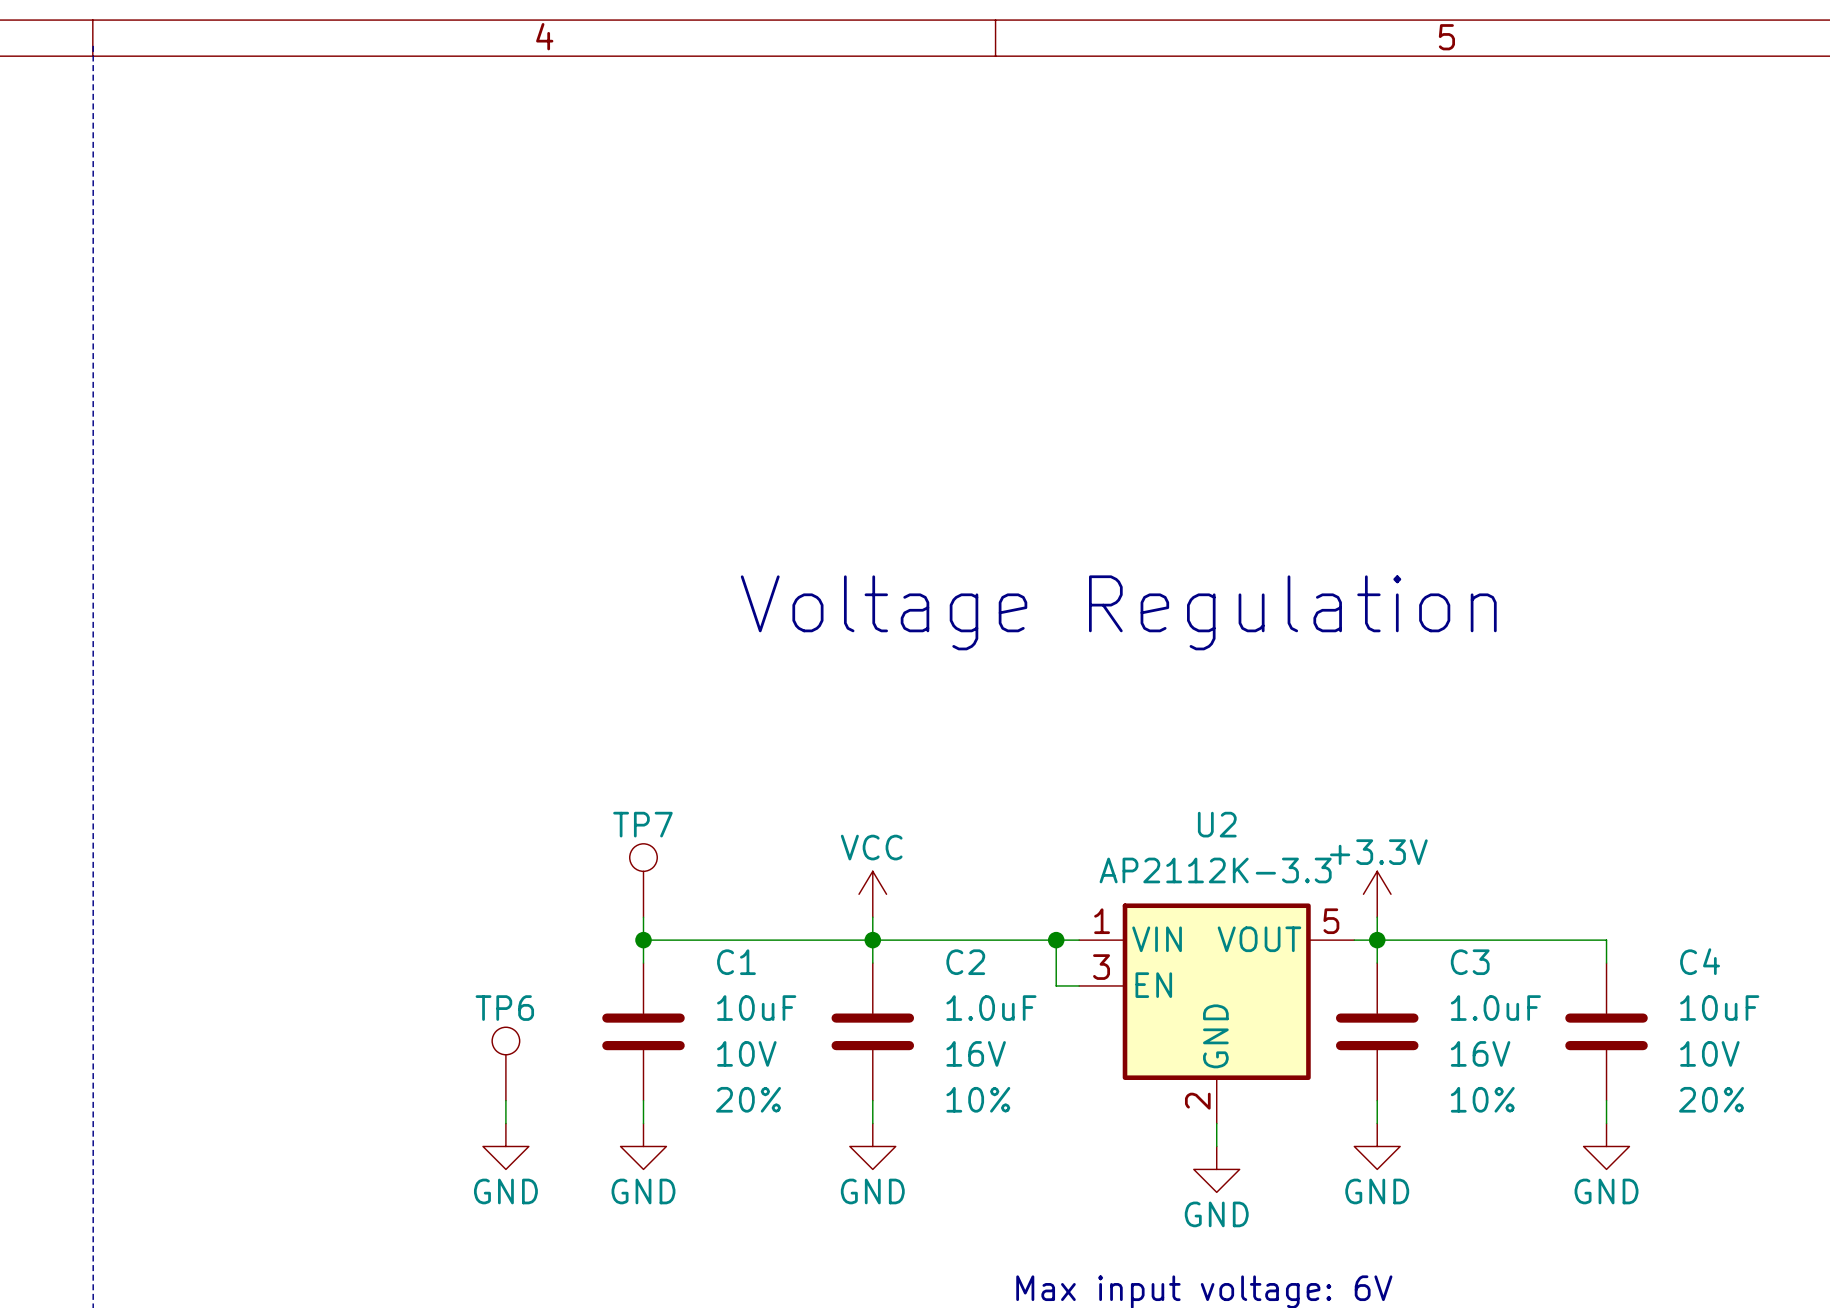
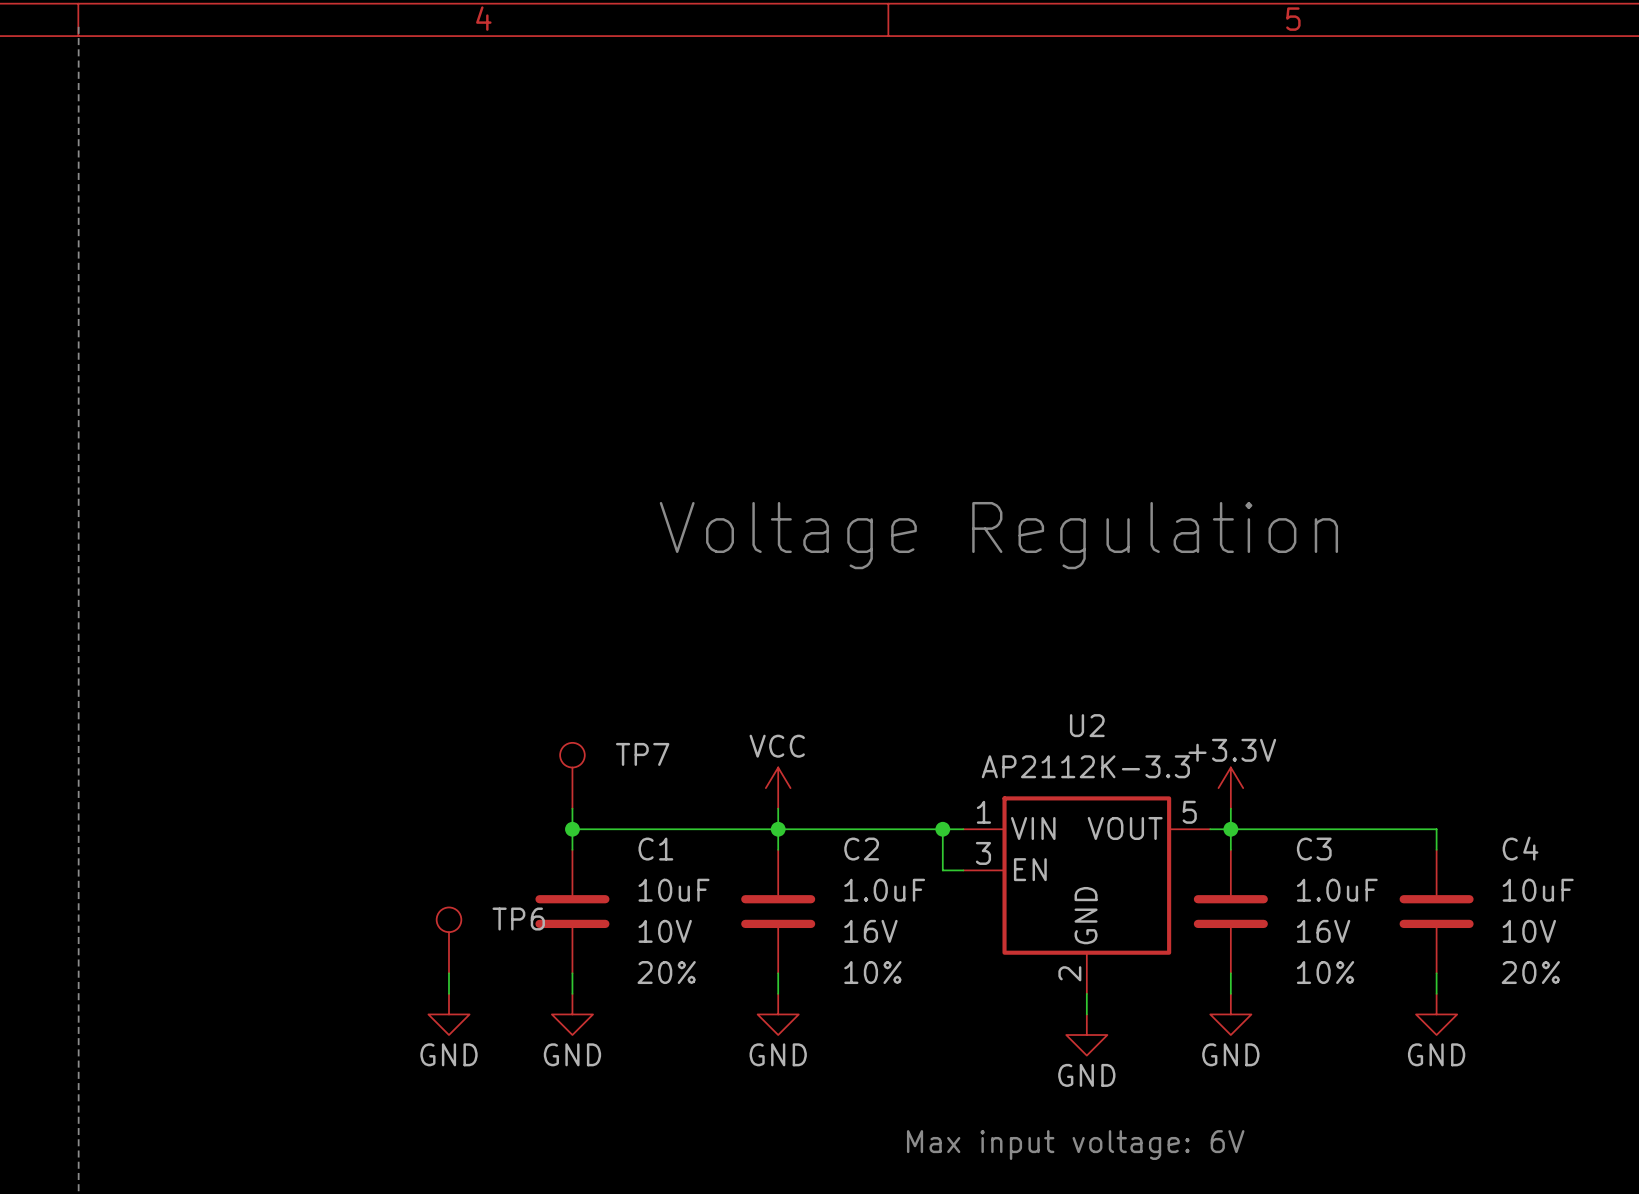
TP7 name position: TP7 (642, 824) -> TP7 (642, 754)
TP6 name position: TP6 (504, 1008) -> TP6 (518, 919)

